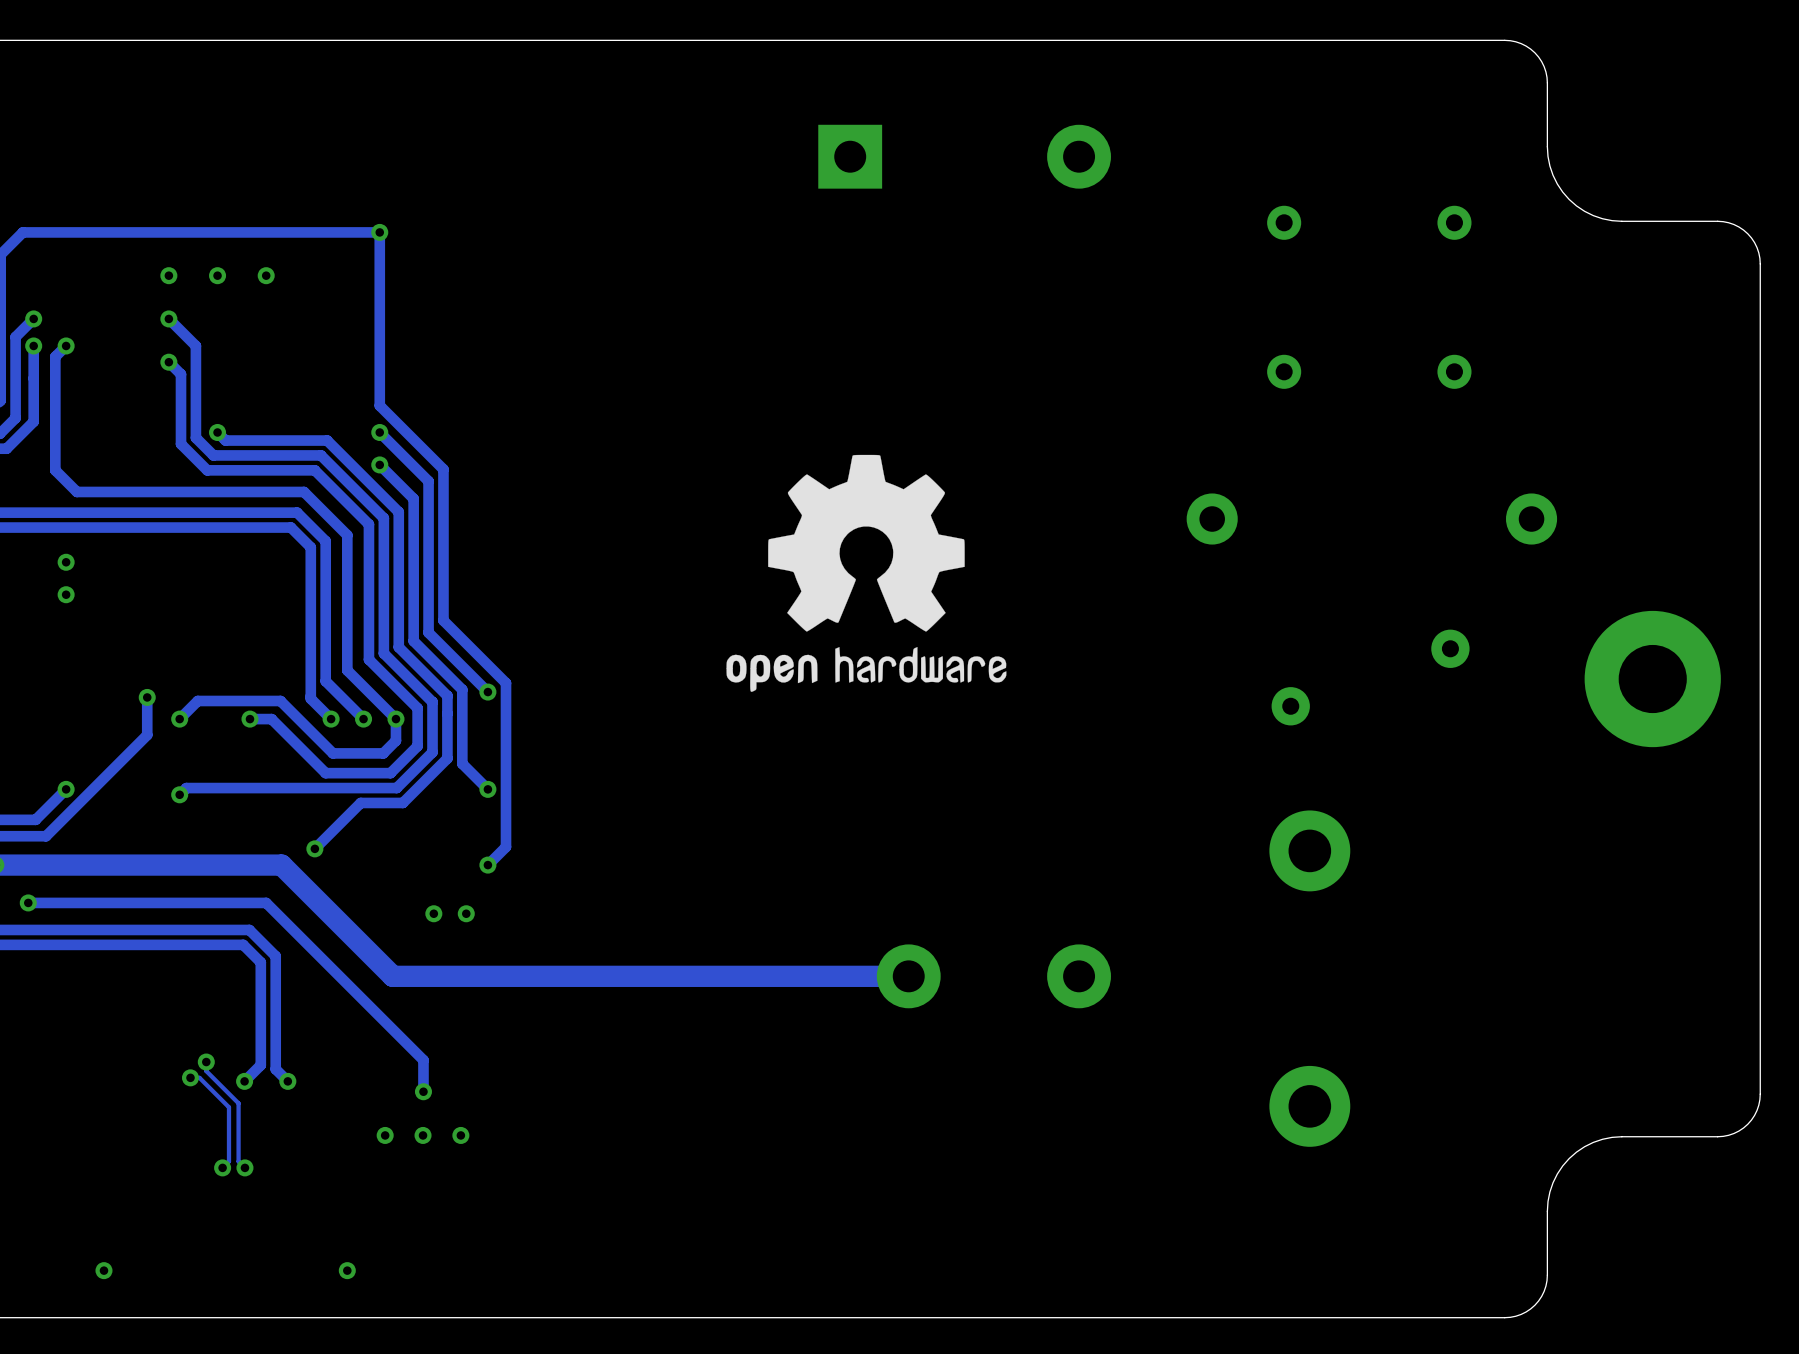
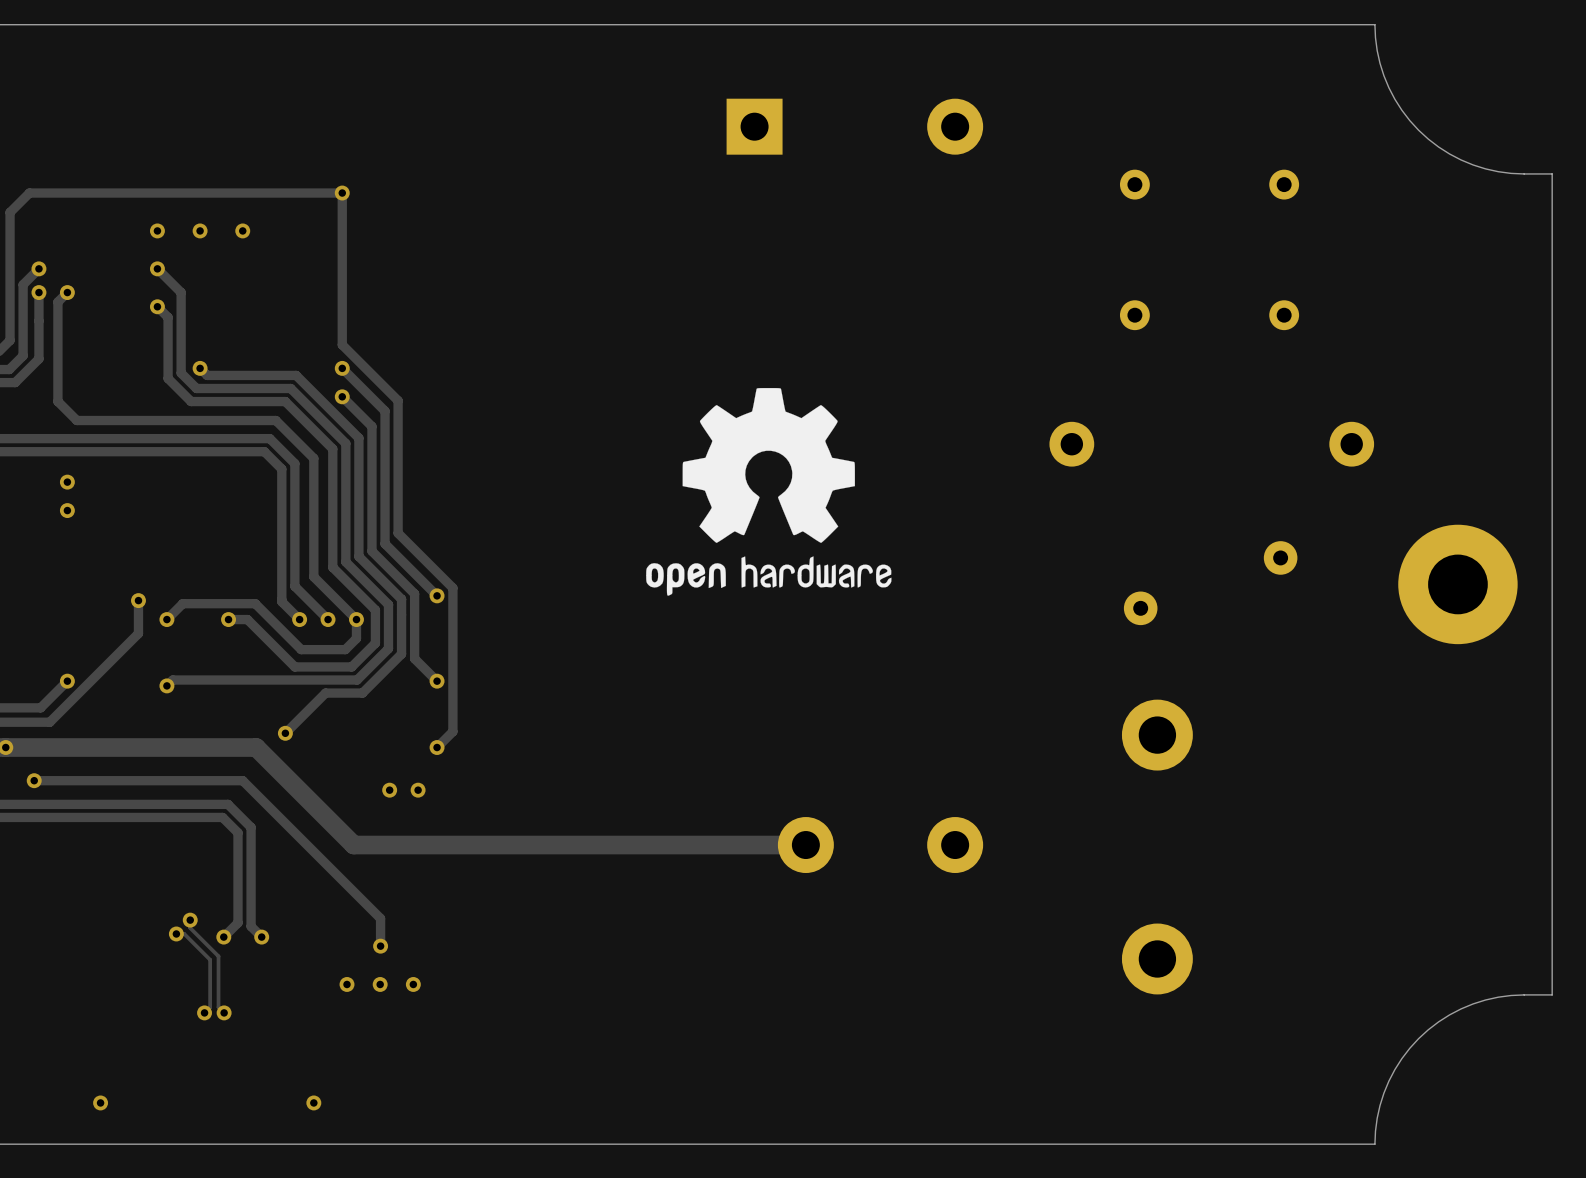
board edge: (1504, 40) (1515, 41) (1530, 49) (1544, 66) (1547, 82) (1547, 146) (1549, 166) (1557, 184) (1576, 205) (1593, 215) (1612, 220) (1728, 222) (1743, 230) (1751, 237) (1757, 247) (1760, 263) -> (1328, 24) (1374, 24) (1380, 63) (1394, 99) (1409, 120) (1438, 146) (1461, 159) (1485, 168) (1511, 173) (1552, 173) (1552, 220)
board edge: (1760, 1094) (1757, 1110) (1751, 1120) (1738, 1131) (1728, 1135) (1612, 1137) (1593, 1142) (1576, 1152) (1557, 1173) (1549, 1191) (1547, 1211) (1547, 1275) (1544, 1291) (1538, 1301) (1526, 1311) (1504, 1317) -> (1552, 948) (1552, 994) (1511, 995) (1485, 1000) (1461, 1008) (1438, 1021) (1409, 1048) (1394, 1069) (1380, 1105) (1374, 1144) (1328, 1144)

